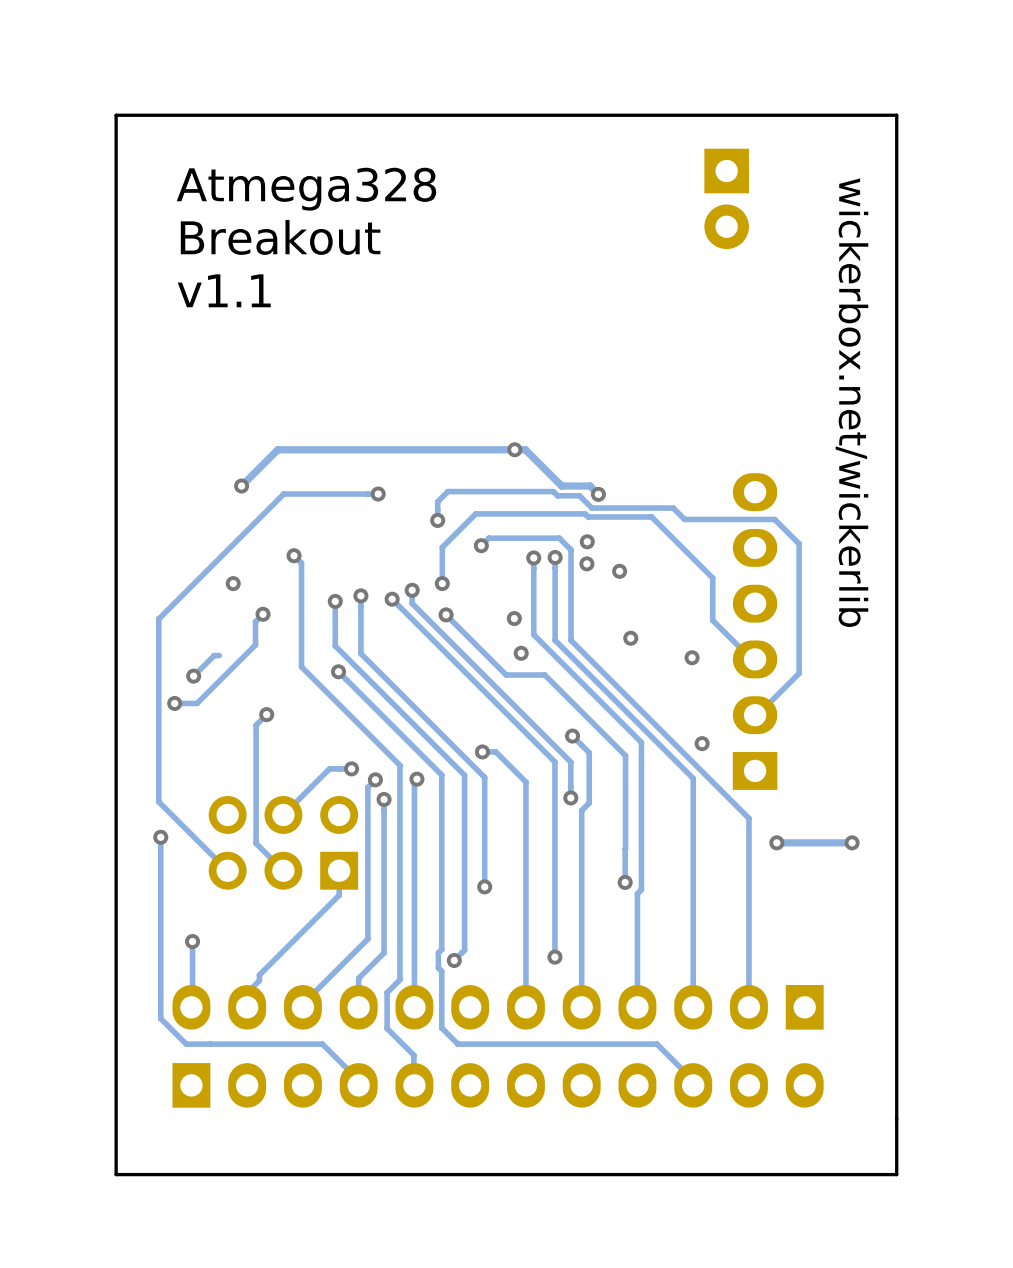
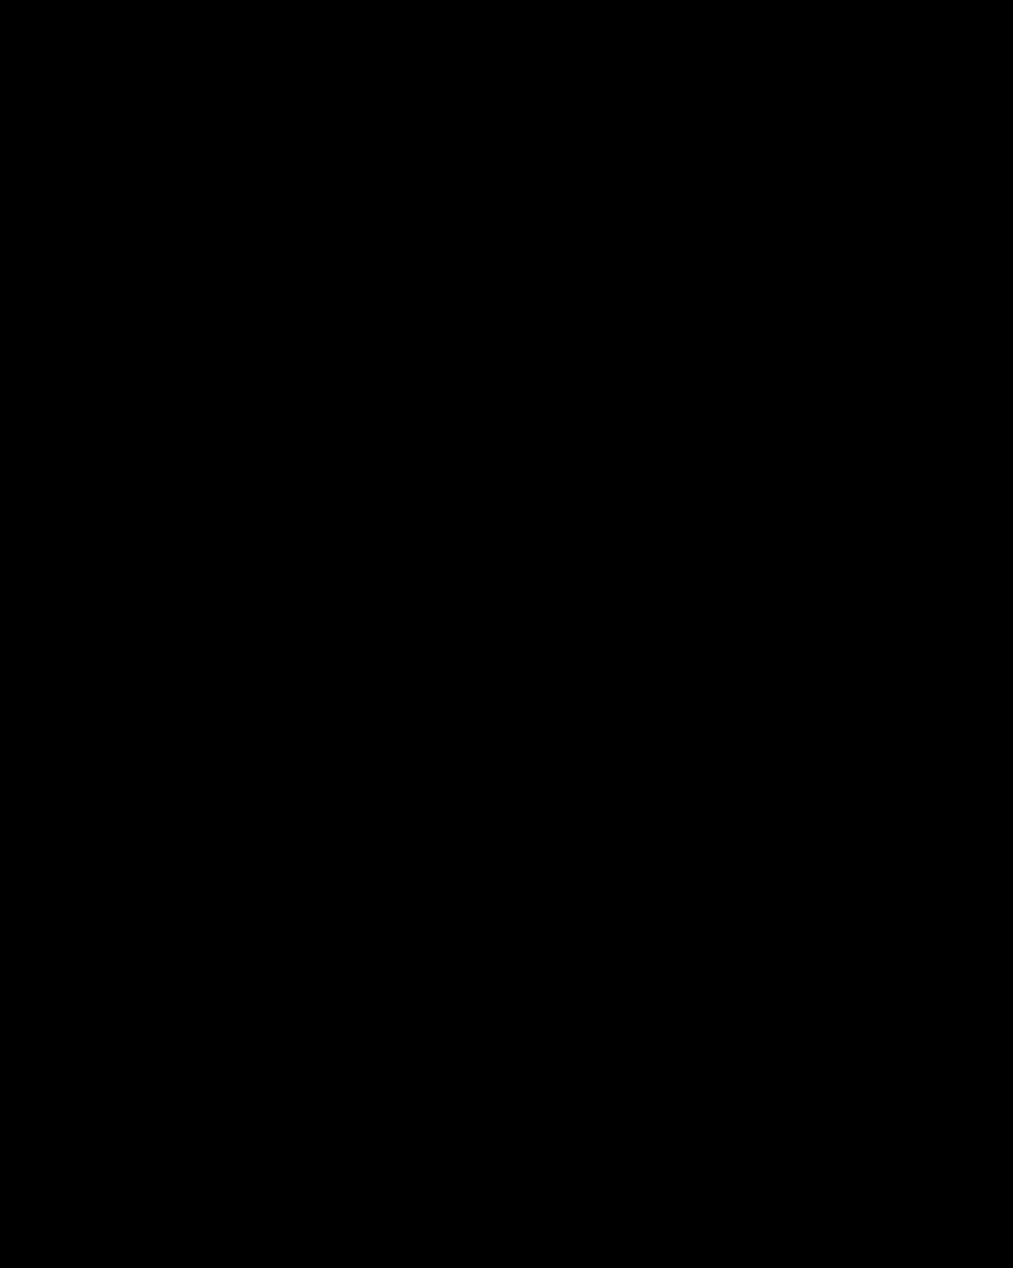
board edge: (896, 115) (896, 1174) (116, 1174) (116, 115) (896, 115) -> none
text: Atmega328 (306, 189) -> none
part: (726, 198) -> none
text: Breakout (280, 237) -> none
text: v1.1 (224, 290) -> none
text: wickerbox.net/wickerlib (851, 402) -> none
via: (514, 449) -> none
track: (241, 486) (277, 449) (525, 449) (561, 486) (590, 486) (598, 494) -> none
via: (241, 486) -> none
track: (378, 494) (283, 494) (158, 619) (158, 801) (227, 870) -> none
via: (378, 494) -> none
via: (598, 494) -> none
track: (437, 520) (437, 501) (447, 491) (553, 491) (557, 495) (579, 495) (591, 508) (673, 508) (684, 519) (774, 519) (799, 543) (799, 673) (757, 714) (754, 714) -> none
via: (437, 520) -> none
via: (587, 541) -> none
track: (481, 545) (488, 538) (559, 538) (571, 549) (571, 640) (748, 818) (748, 1007) -> none
via: (481, 545) -> none
track: (294, 555) (301, 563) (301, 666) (399, 765) (399, 979) (387, 992) (387, 1028) (413, 1055) (413, 1083) -> none
via: (294, 555) -> none
track: (533, 557) (533, 634) (641, 742) (641, 889) (637, 893) (637, 1007) -> none
via: (533, 557) -> none
track: (555, 557) (555, 640) (693, 778) (693, 1007) -> none
via: (555, 557) -> none
via: (586, 563) -> none
via: (619, 571) -> none
via: (233, 583) -> none
track: (442, 583) (442, 547) (475, 513) (585, 513) (588, 516) (651, 516) (712, 578) (712, 620) (751, 659) (755, 659) -> none
via: (442, 583) -> none
track: (412, 590) (412, 603) (570, 762) (570, 797) -> none
via: (412, 590) -> none
track: (360, 595) (360, 653) (484, 777) (484, 886) -> none
via: (360, 595) -> none
track: (392, 599) (554, 762) (554, 957) -> none
via: (392, 599) -> none
track: (335, 601) (335, 646) (464, 775) (464, 950) (454, 960) -> none
via: (335, 601) -> none
track: (263, 614) (255, 621) (255, 644) (196, 703) (174, 703) -> none
via: (263, 614) -> none
track: (446, 614) (506, 675) (544, 675) (625, 755) (625, 882) -> none
via: (446, 614) -> none
via: (514, 618) -> none
part: (755, 631) -> none
via: (630, 638) -> none
via: (521, 653) -> none
track: (219, 655) (214, 655) (193, 676) -> none
via: (692, 657) -> none
track: (338, 671) (441, 775) (441, 949) (438, 952) (438, 968) (441, 971) (441, 1027) (457, 1044) (656, 1044) (692, 1079) (692, 1083) -> none
via: (338, 671) -> none
via: (193, 676) -> none
via: (174, 703) -> none
track: (266, 714) (256, 725) (256, 843) (283, 870) -> none
via: (266, 714) -> none
track: (572, 736) (589, 752) (589, 803) (581, 810) (581, 1007) -> none
via: (572, 736) -> none
via: (702, 743) -> none
track: (482, 751) (495, 751) (525, 782) (525, 1007) -> none
via: (482, 751) -> none
track: (351, 768) (329, 768) (283, 814) -> none
via: (351, 768) -> none
track: (375, 779) (367, 787) (367, 939) (302, 1003) (302, 1007) -> none
via: (375, 779) -> none
track: (416, 779) (414, 781) (414, 1007) -> none
via: (416, 779) -> none
via: (570, 797) -> none
track: (384, 799) (384, 952) (358, 978) (358, 1007) -> none
via: (384, 799) -> none
track: (160, 837) (160, 1018) (186, 1044) (322, 1044) (358, 1079) (358, 1083) -> none
via: (160, 837) -> none
part: (283, 842) -> none
via: (776, 842) -> none
track: (852, 842) (776, 842) -> none
via: (852, 842) -> none
track: (339, 870) (339, 895) (259, 974) (259, 980) (247, 992) (247, 1007) -> none
via: (625, 882) -> none
via: (484, 886) -> none
track: (192, 941) (192, 1026) -> none
via: (192, 941) -> none
via: (554, 957) -> none
via: (454, 960) -> none
part: (498, 1007) -> none
part: (498, 1085) -> none

